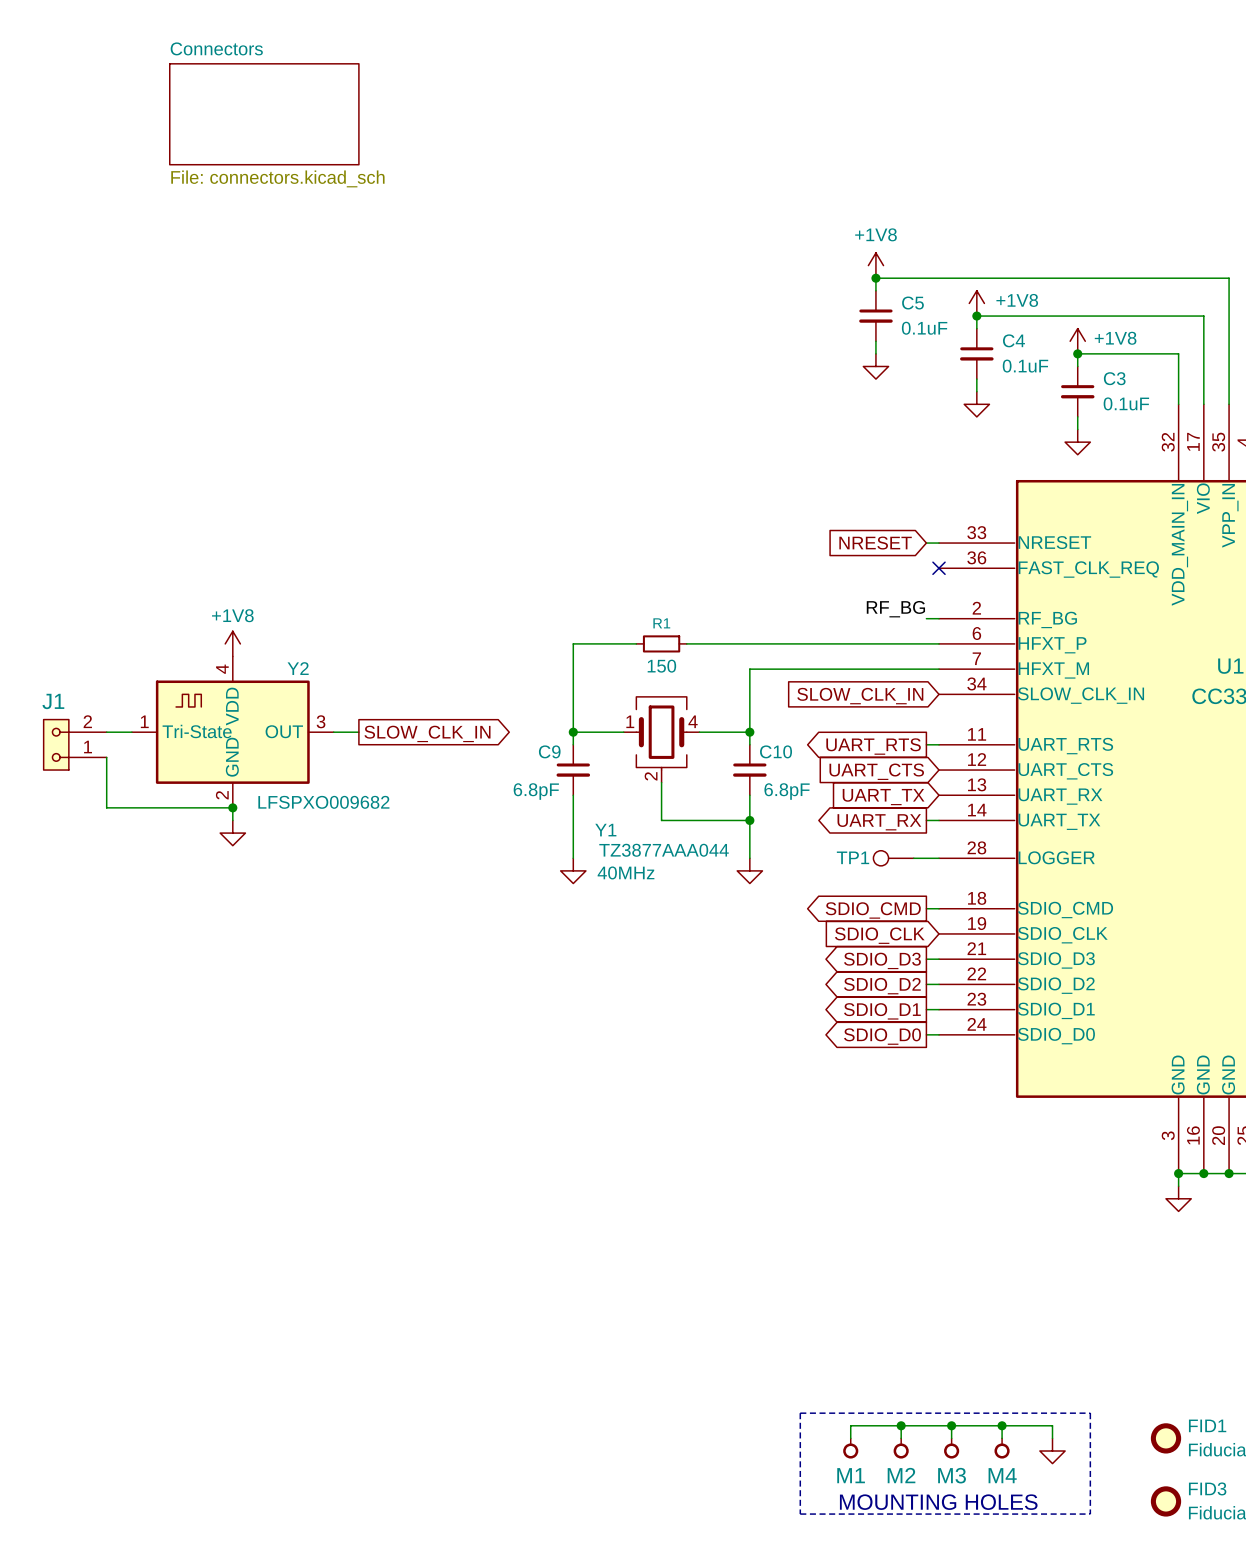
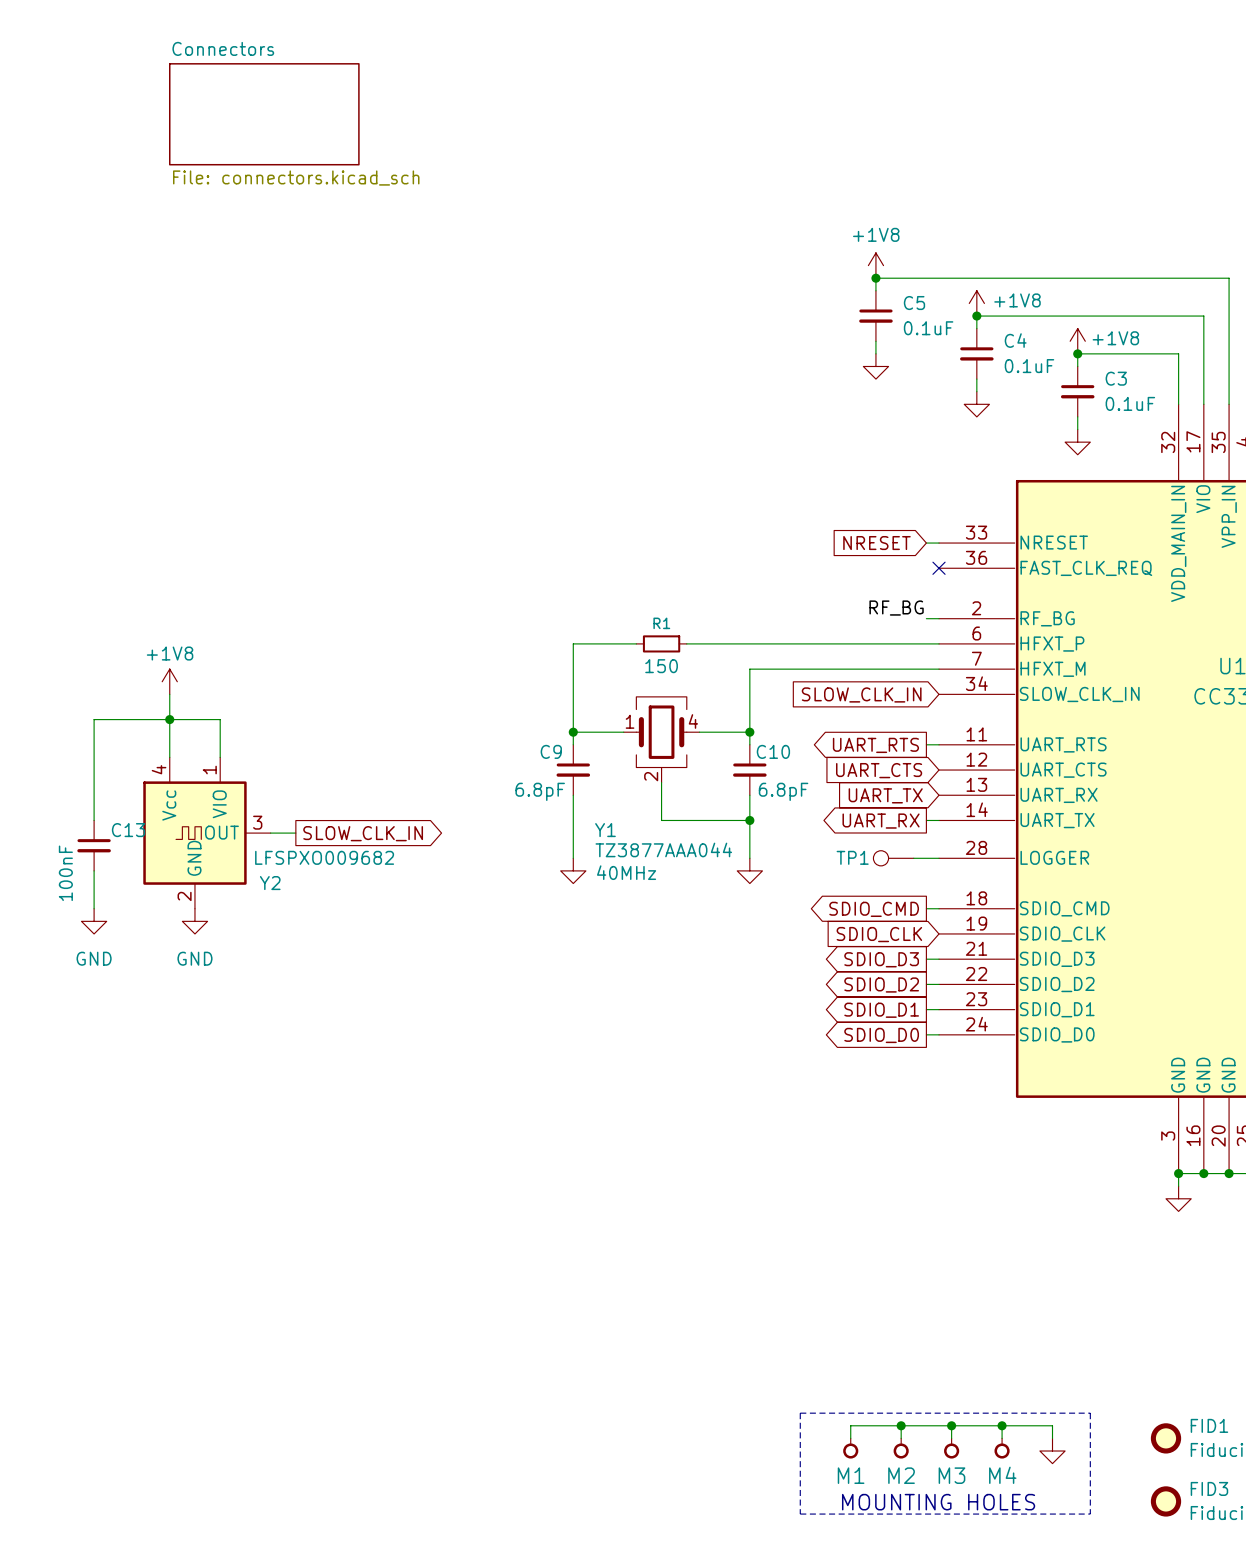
power symbol position: +1V8 (232, 643) -> +1V8 (169, 681)
Y2 symbol: [131, 656, 334, 808] -> [143, 757, 271, 909]
Y2 name position: Y2 (298, 668) -> Y2 (270, 883)
junction: none -> (169, 719)
wire: (106, 732) (131, 732) -> none
wire: (333, 732) (358, 732) -> (270, 833) (295, 833)
global label position: SLOW_CLK_IN (427, 733) -> SLOW_CLK_IN (363, 833)
J1: (75, 744) -> none
wire: (106, 757) (106, 807) (232, 807) (232, 820) -> none
wire: none -> (220, 757) (220, 719) (94, 719) (94, 820)
Y2 value position: LFSPXO009682 (323, 802) -> LFSPXO009682 (324, 857)
junction: (232, 807) -> none
power symbol: (232, 833) -> none
C13: none -> 100nF (94, 845)
wire: none -> (94, 870) (94, 908)
power symbol: none -> GND (94, 921)
power symbol: none -> GND (194, 921)

